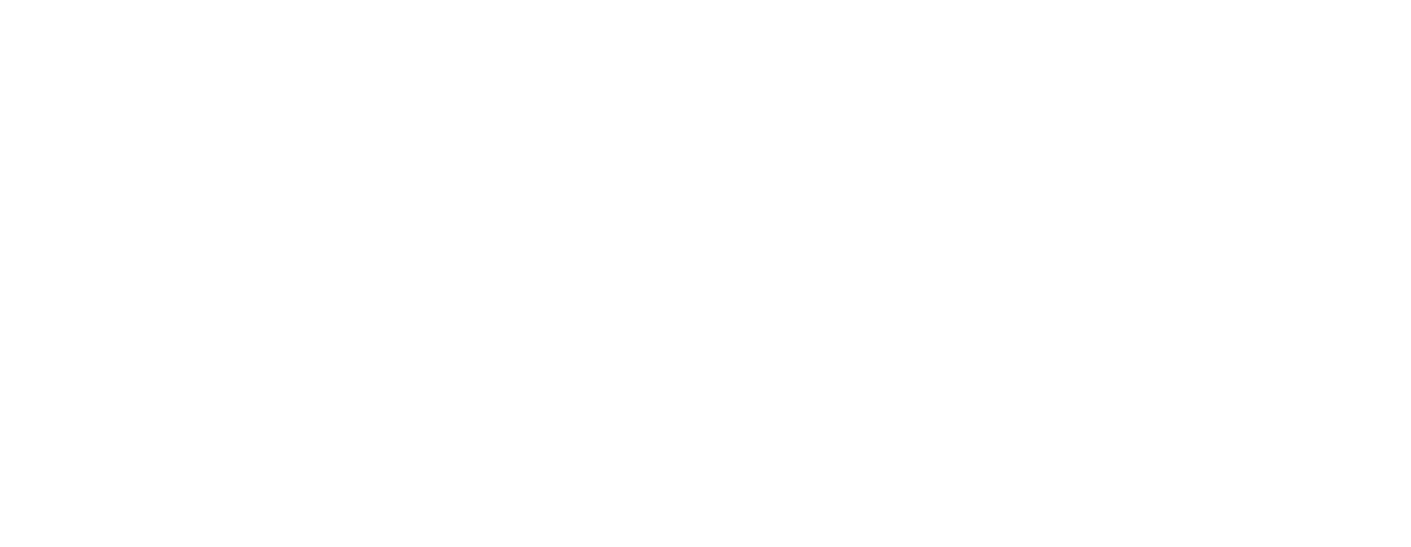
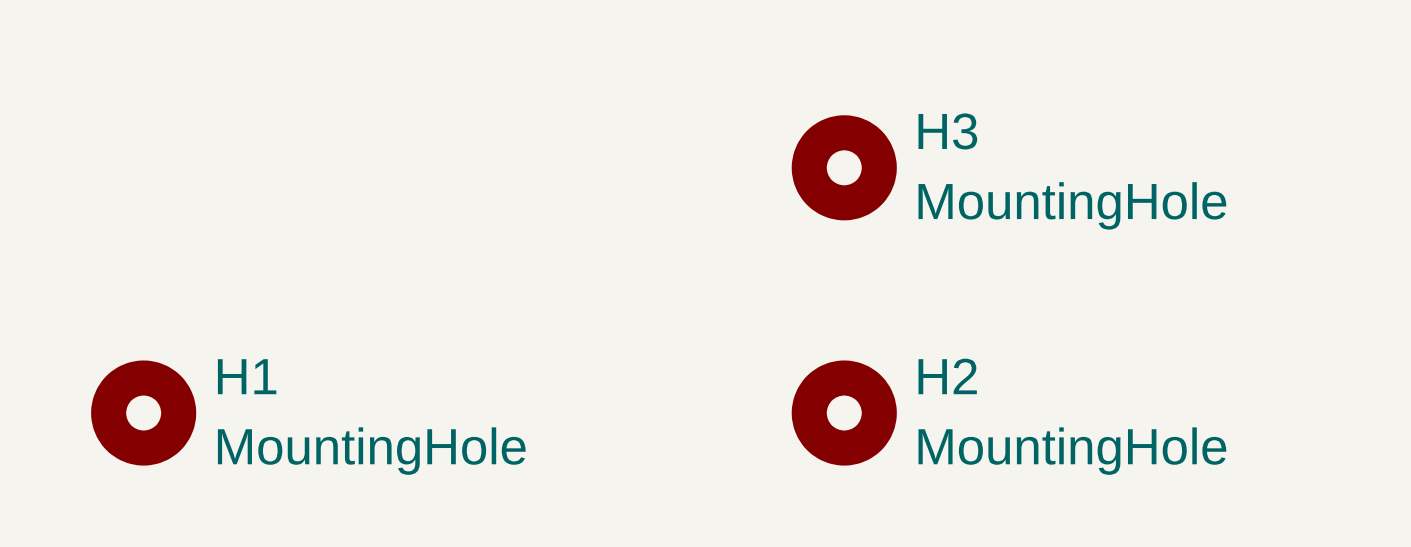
H3: none -> MountingHole (844, 167)
H1: none -> MountingHole (143, 413)
H2: none -> MountingHole (844, 413)

